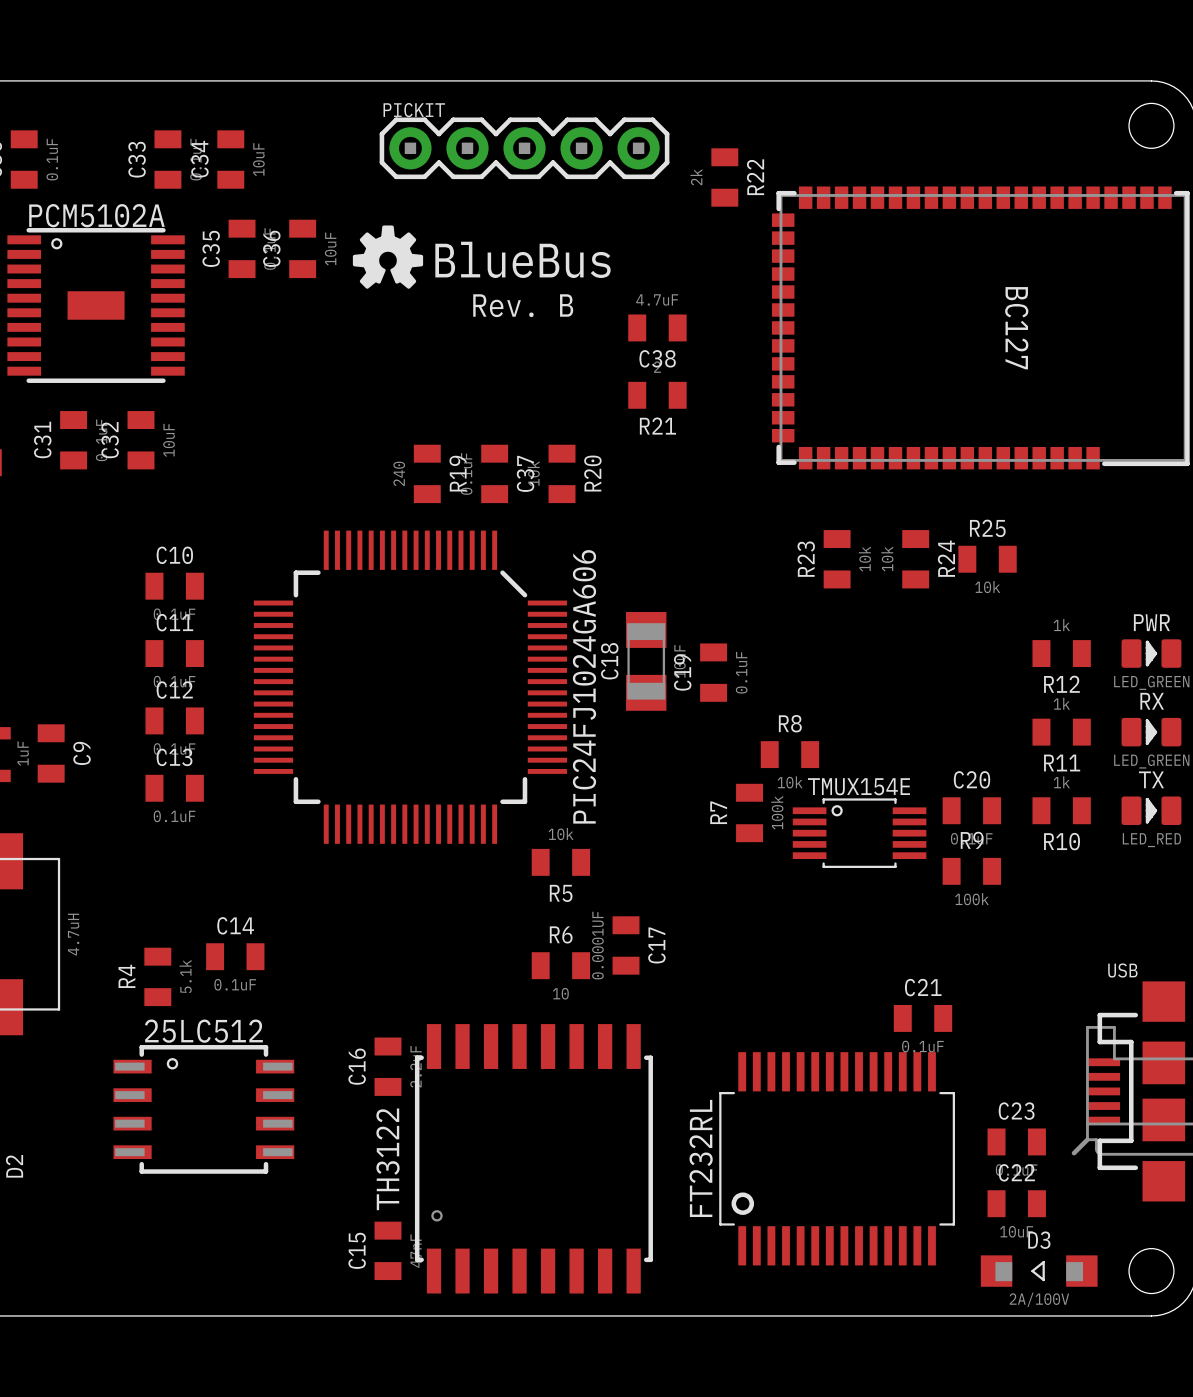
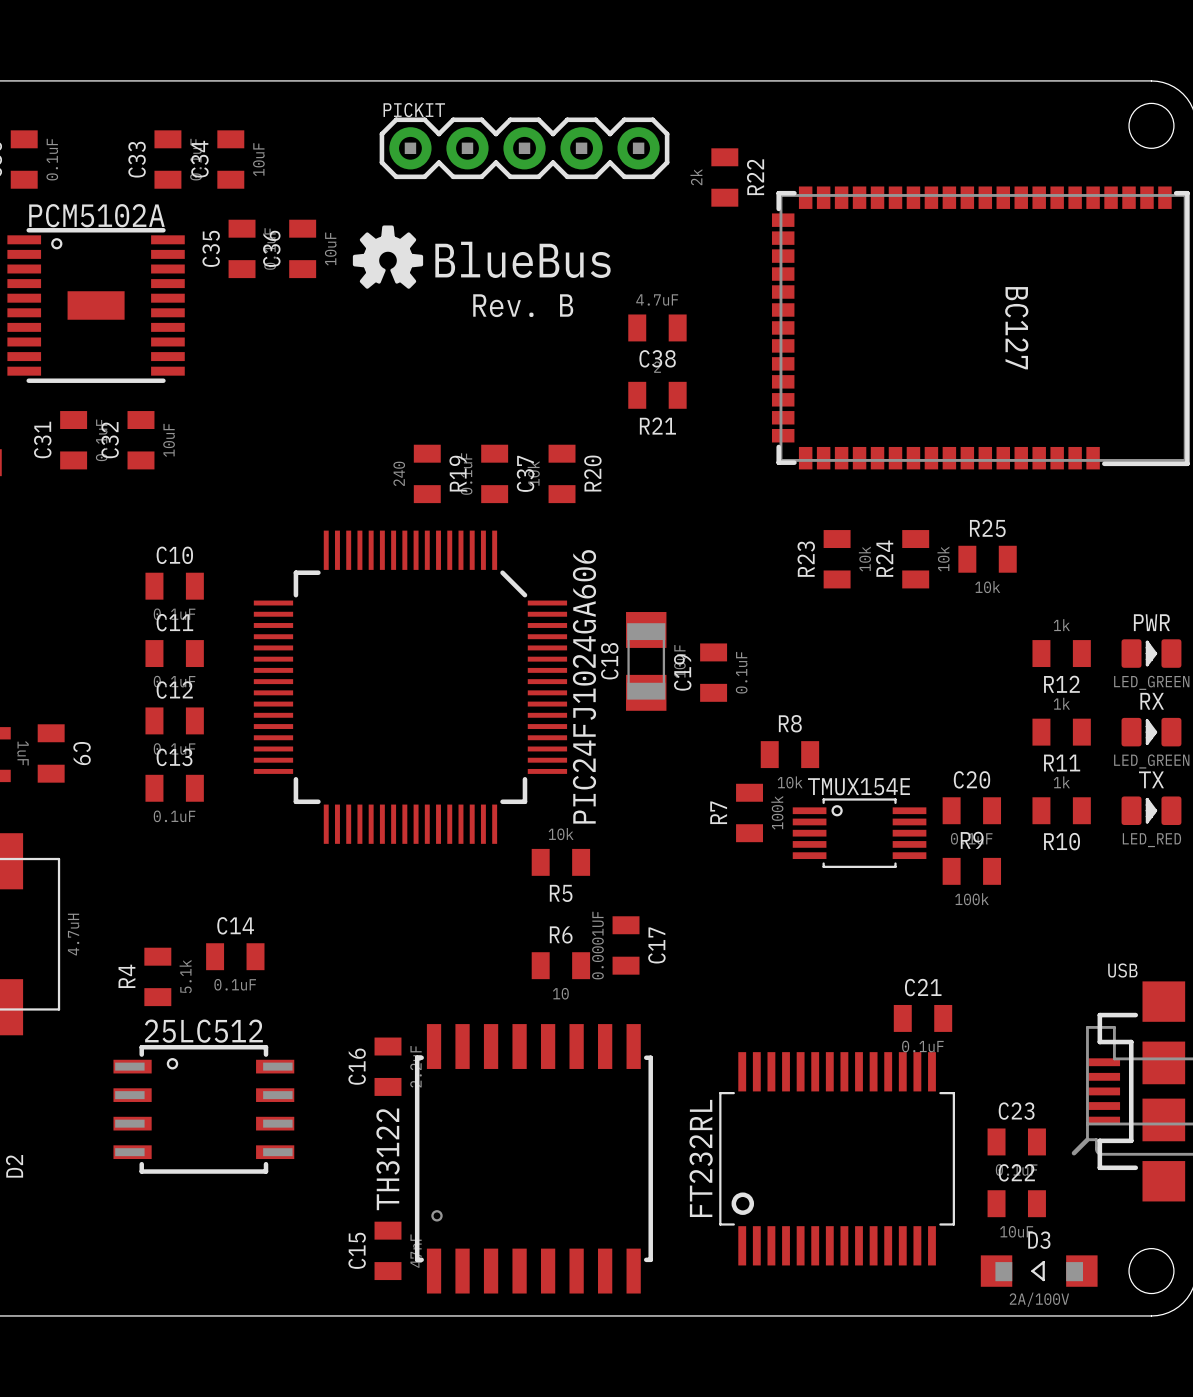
R24 name position: R24 (946, 558) -> R24 (884, 558)
R24 value position: 10k (887, 559) -> 10k (943, 559)
C9 value rotation: 0° (23, 753) -> 180° (23, 753)
C9 name rotation: 0° (82, 753) -> 180° (82, 753)

